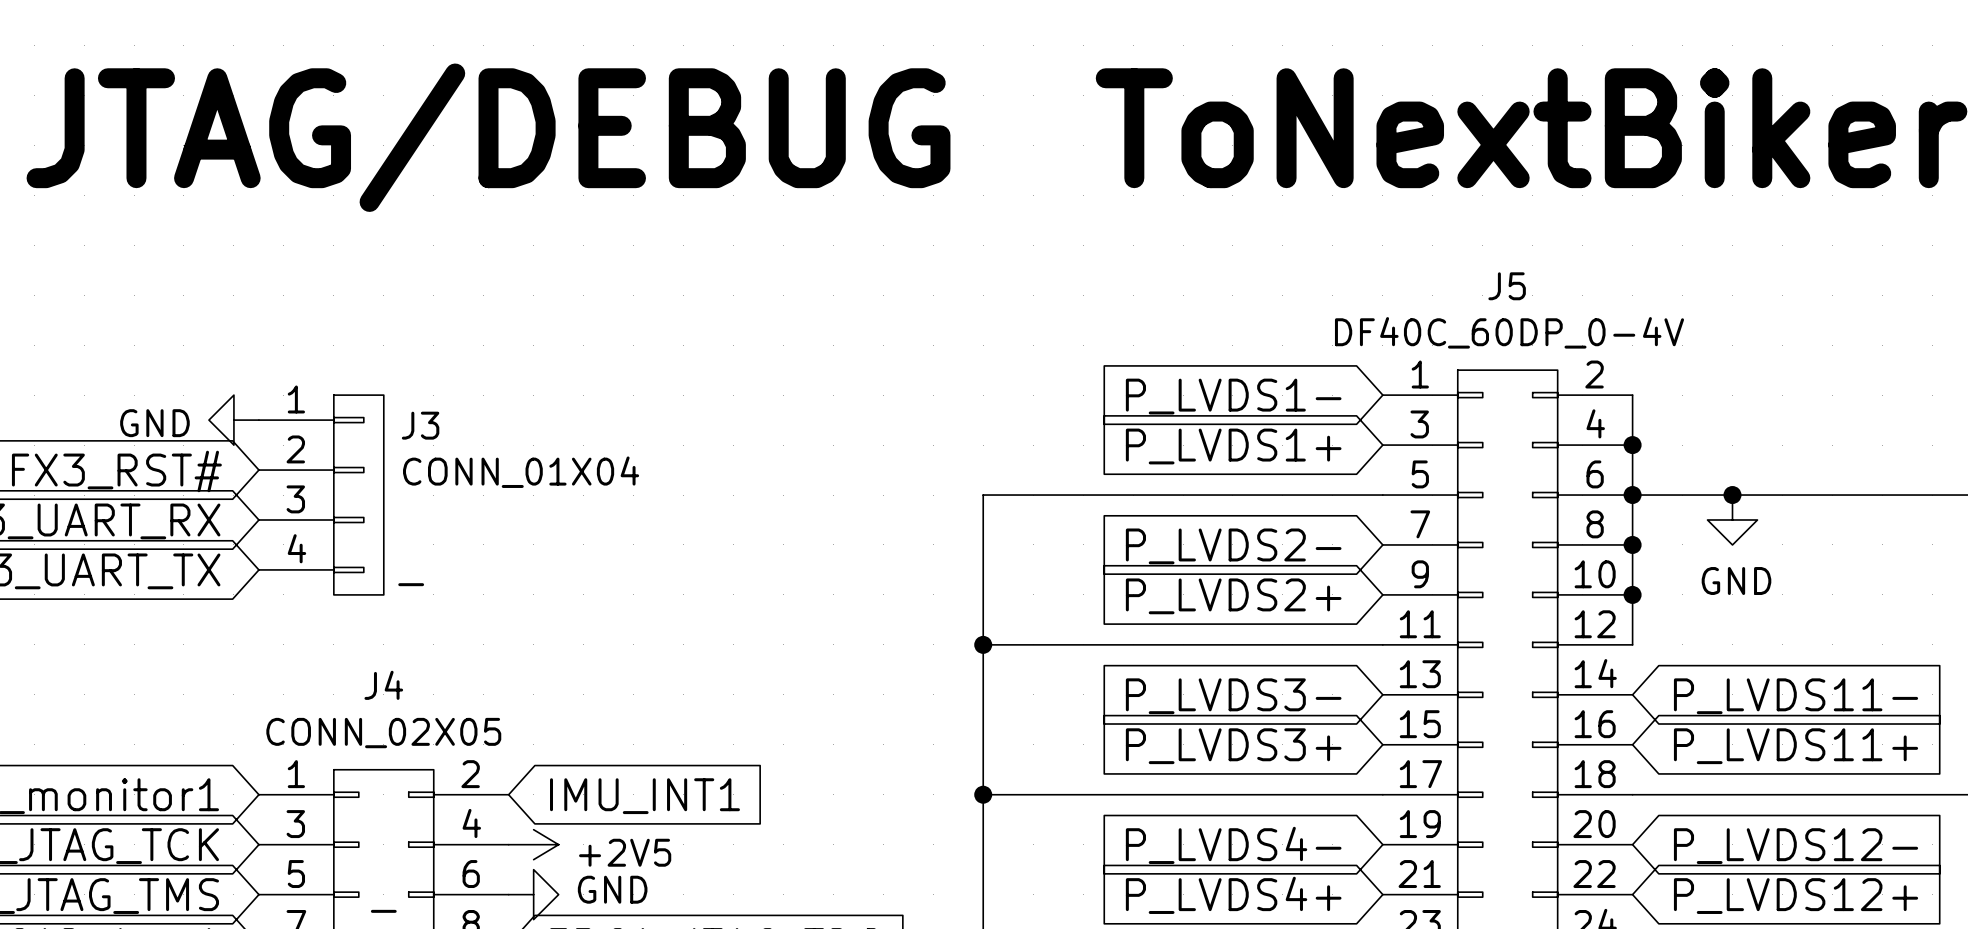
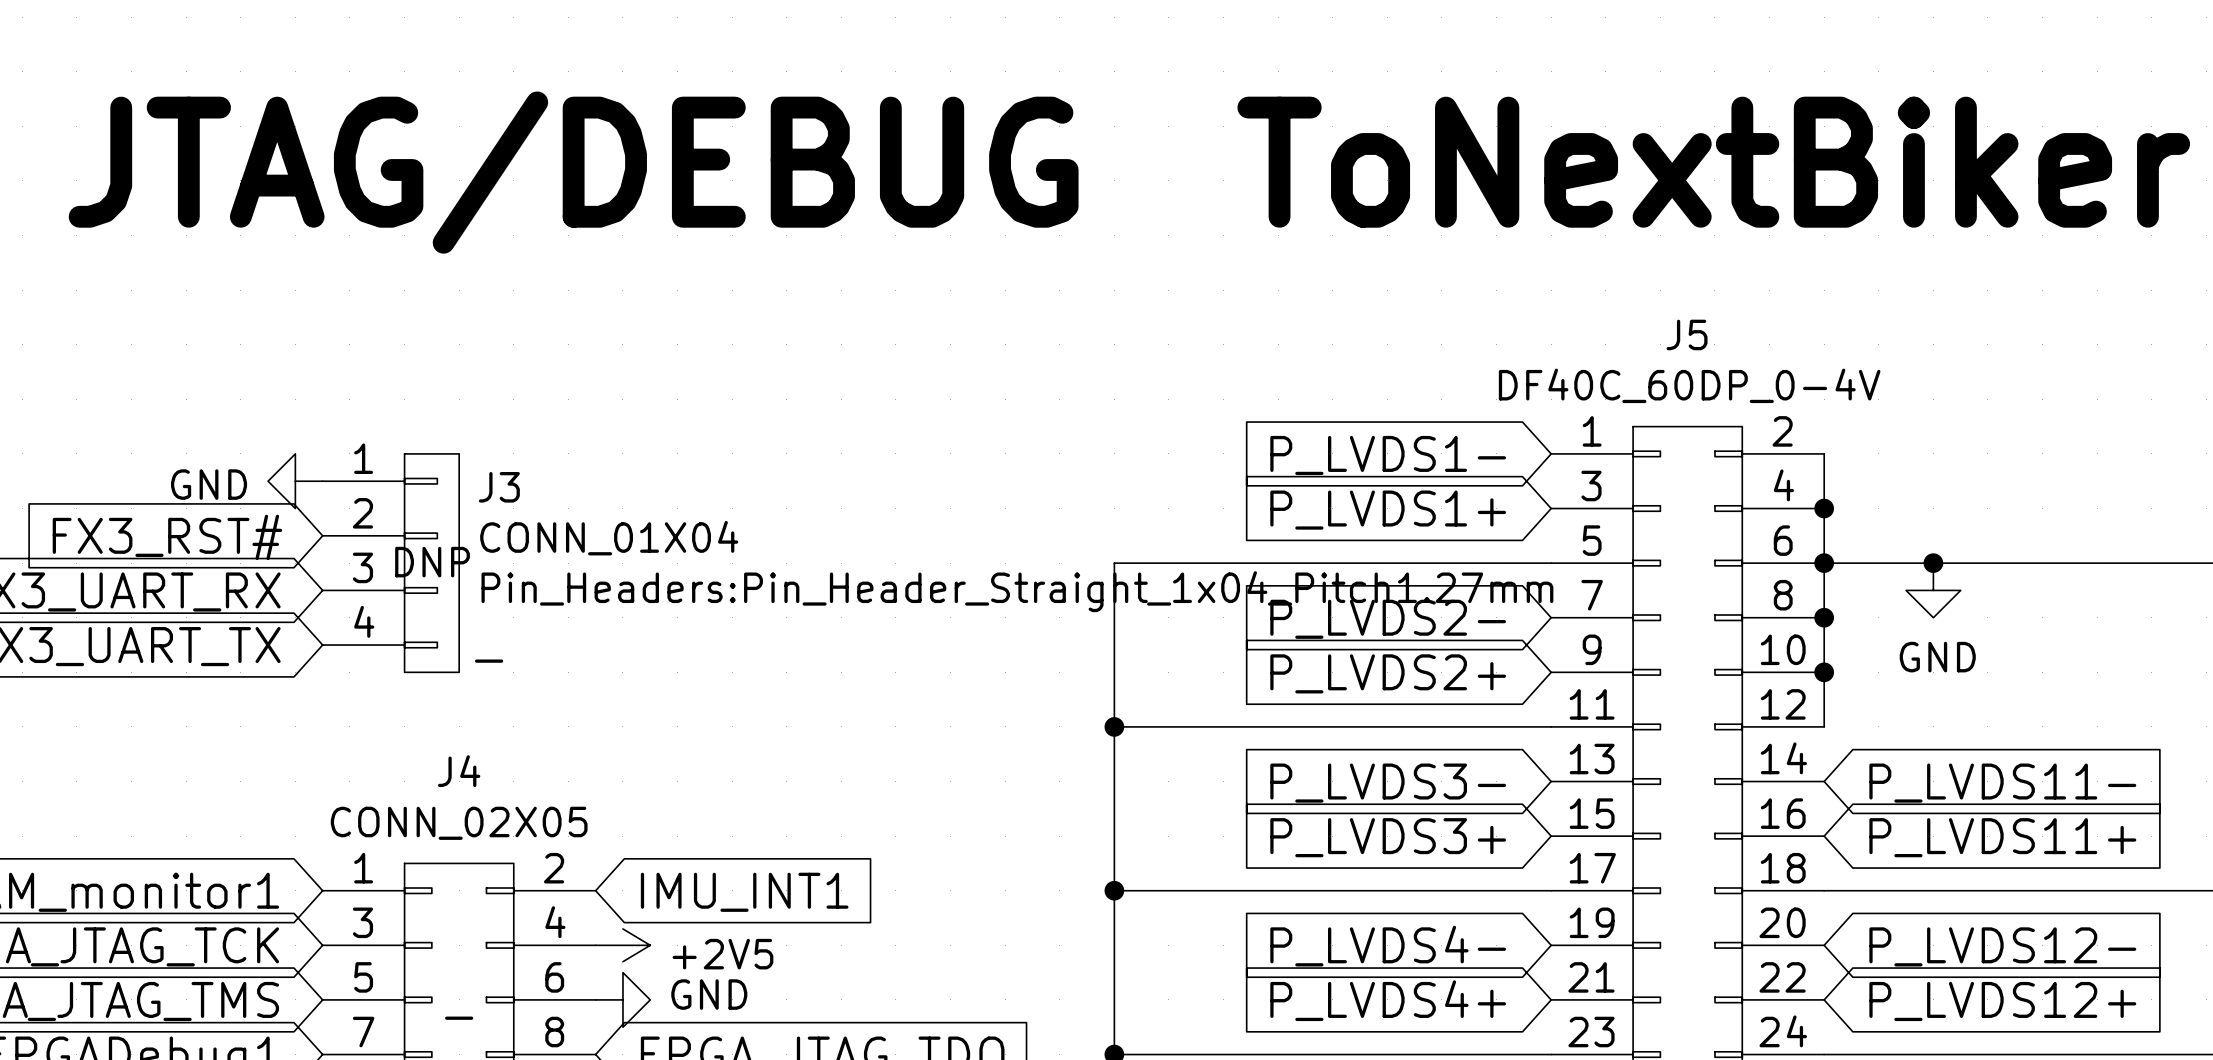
J3 text: none -> DNP (432, 562)
J3 text: none -> Pin_Headers:Pin_Header_Straight_1x04_Pitch1.27mm (1017, 591)

